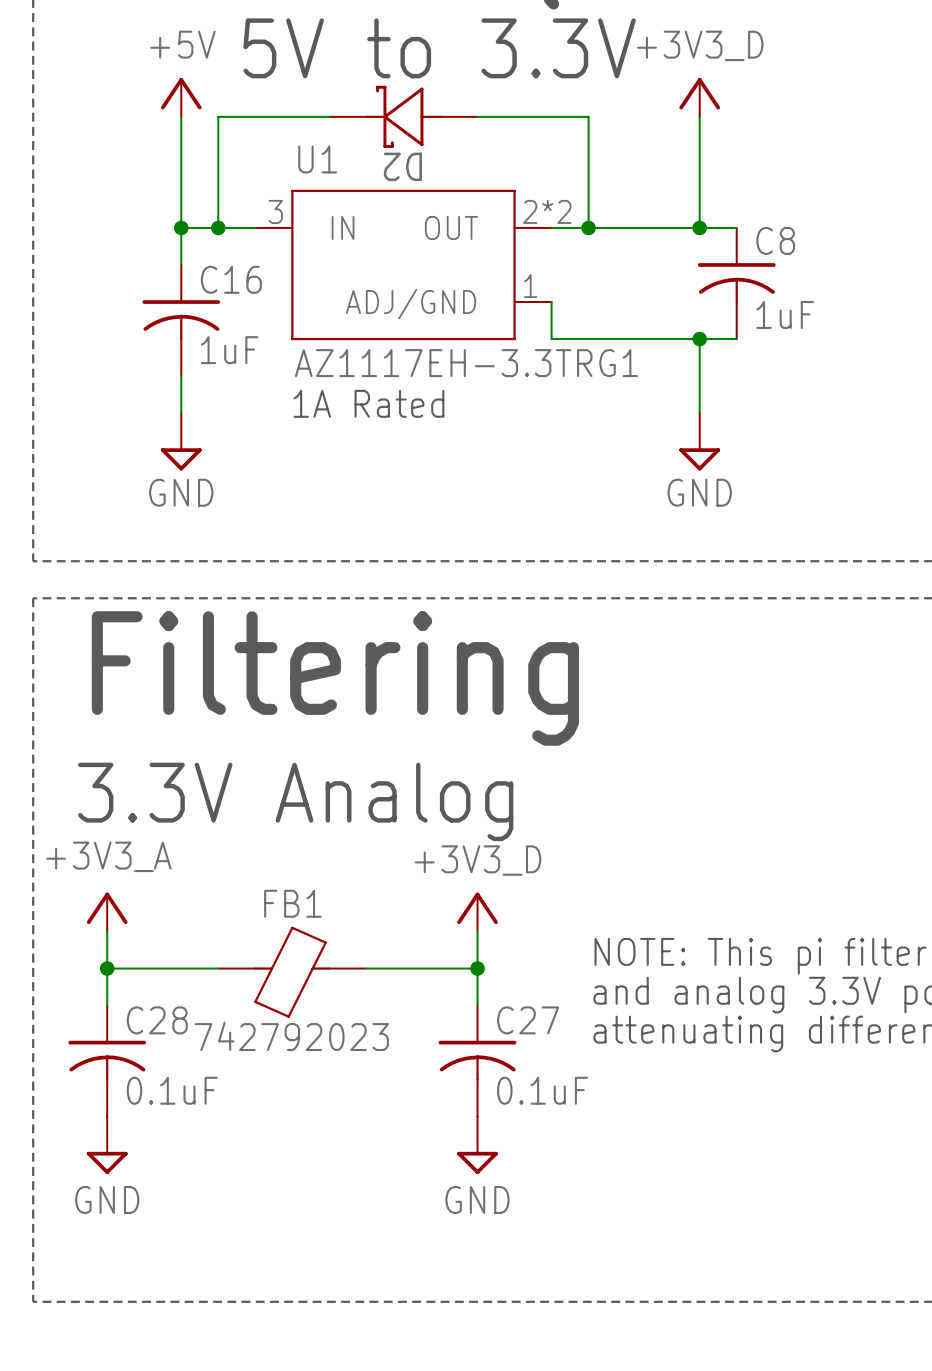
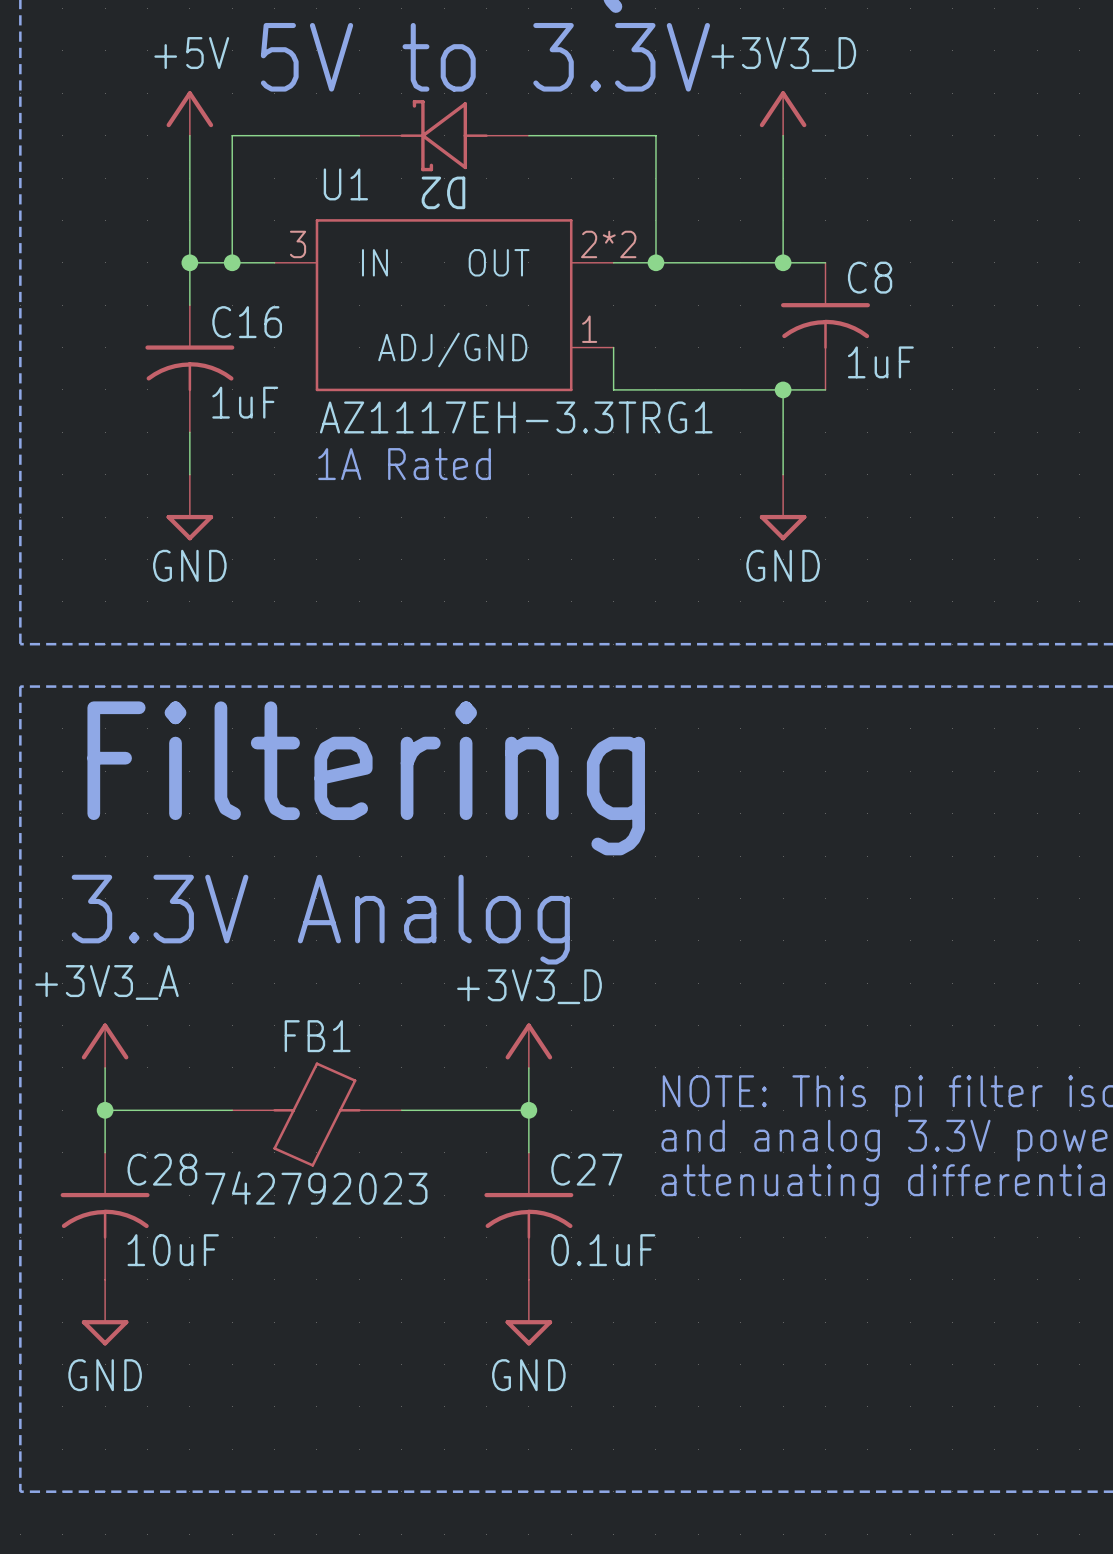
C28 value: 0.1uF (172, 1090) -> 10uF (173, 1250)

